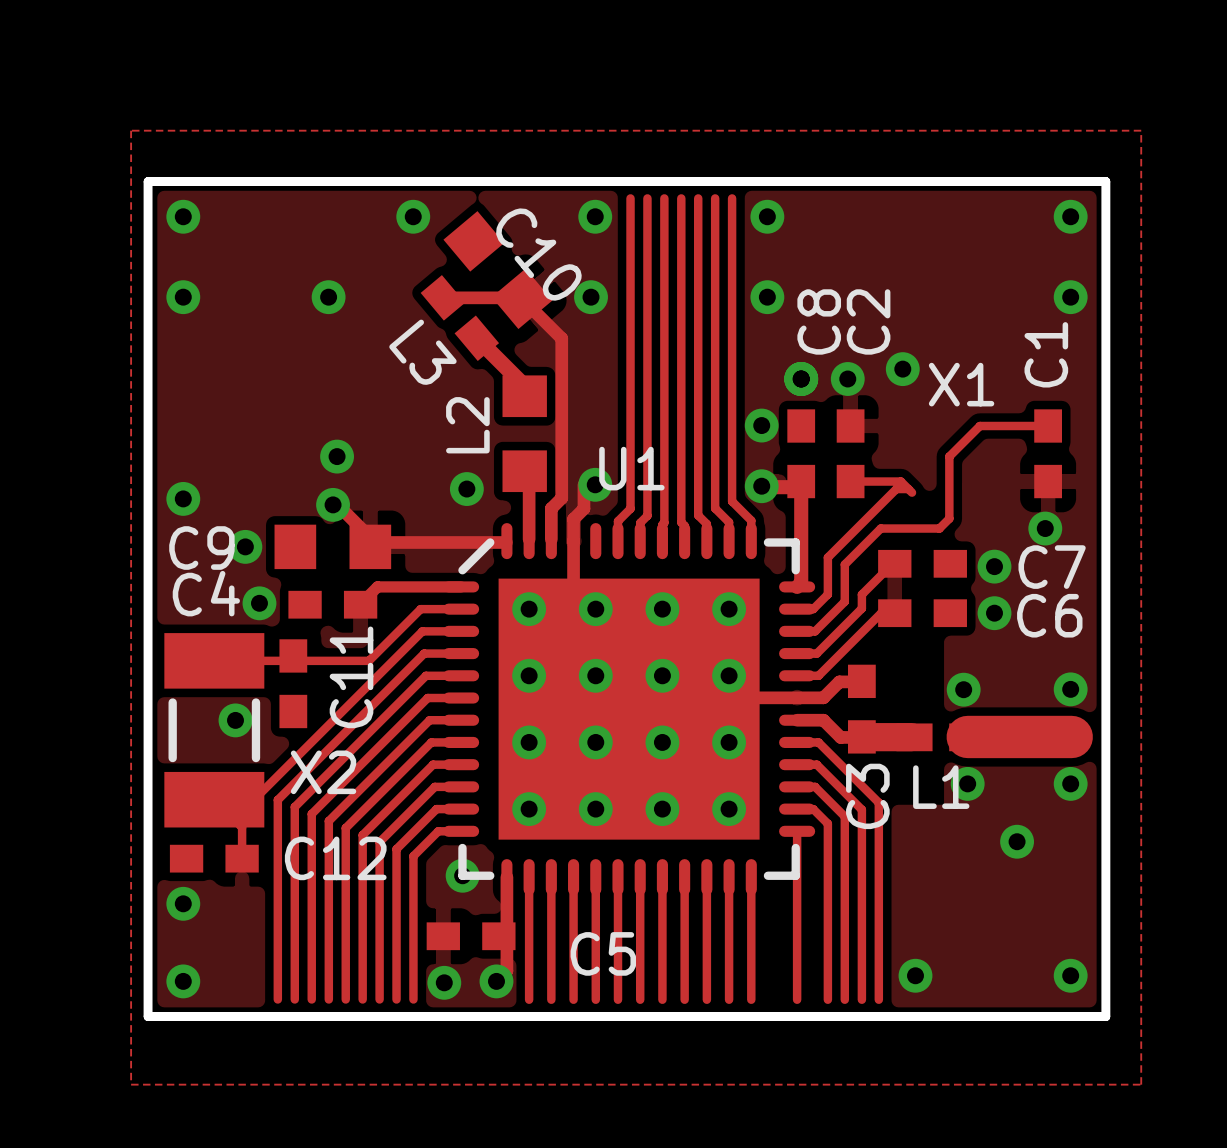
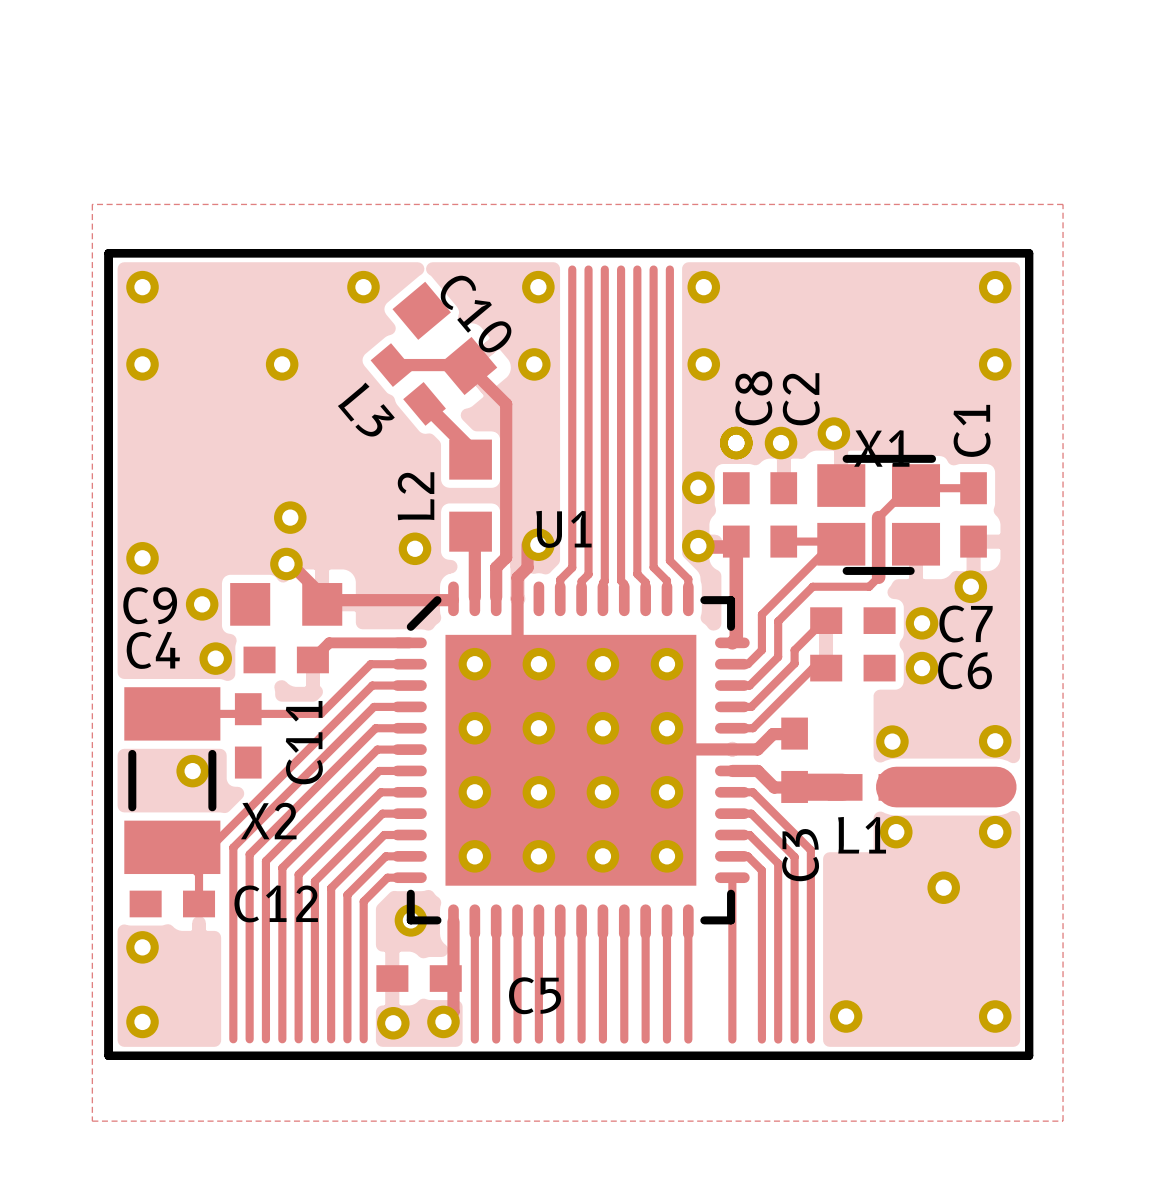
part: none -> (878, 514)
track width: thin (949, 456) (949, 518) -> thick (878, 517) (878, 577)

